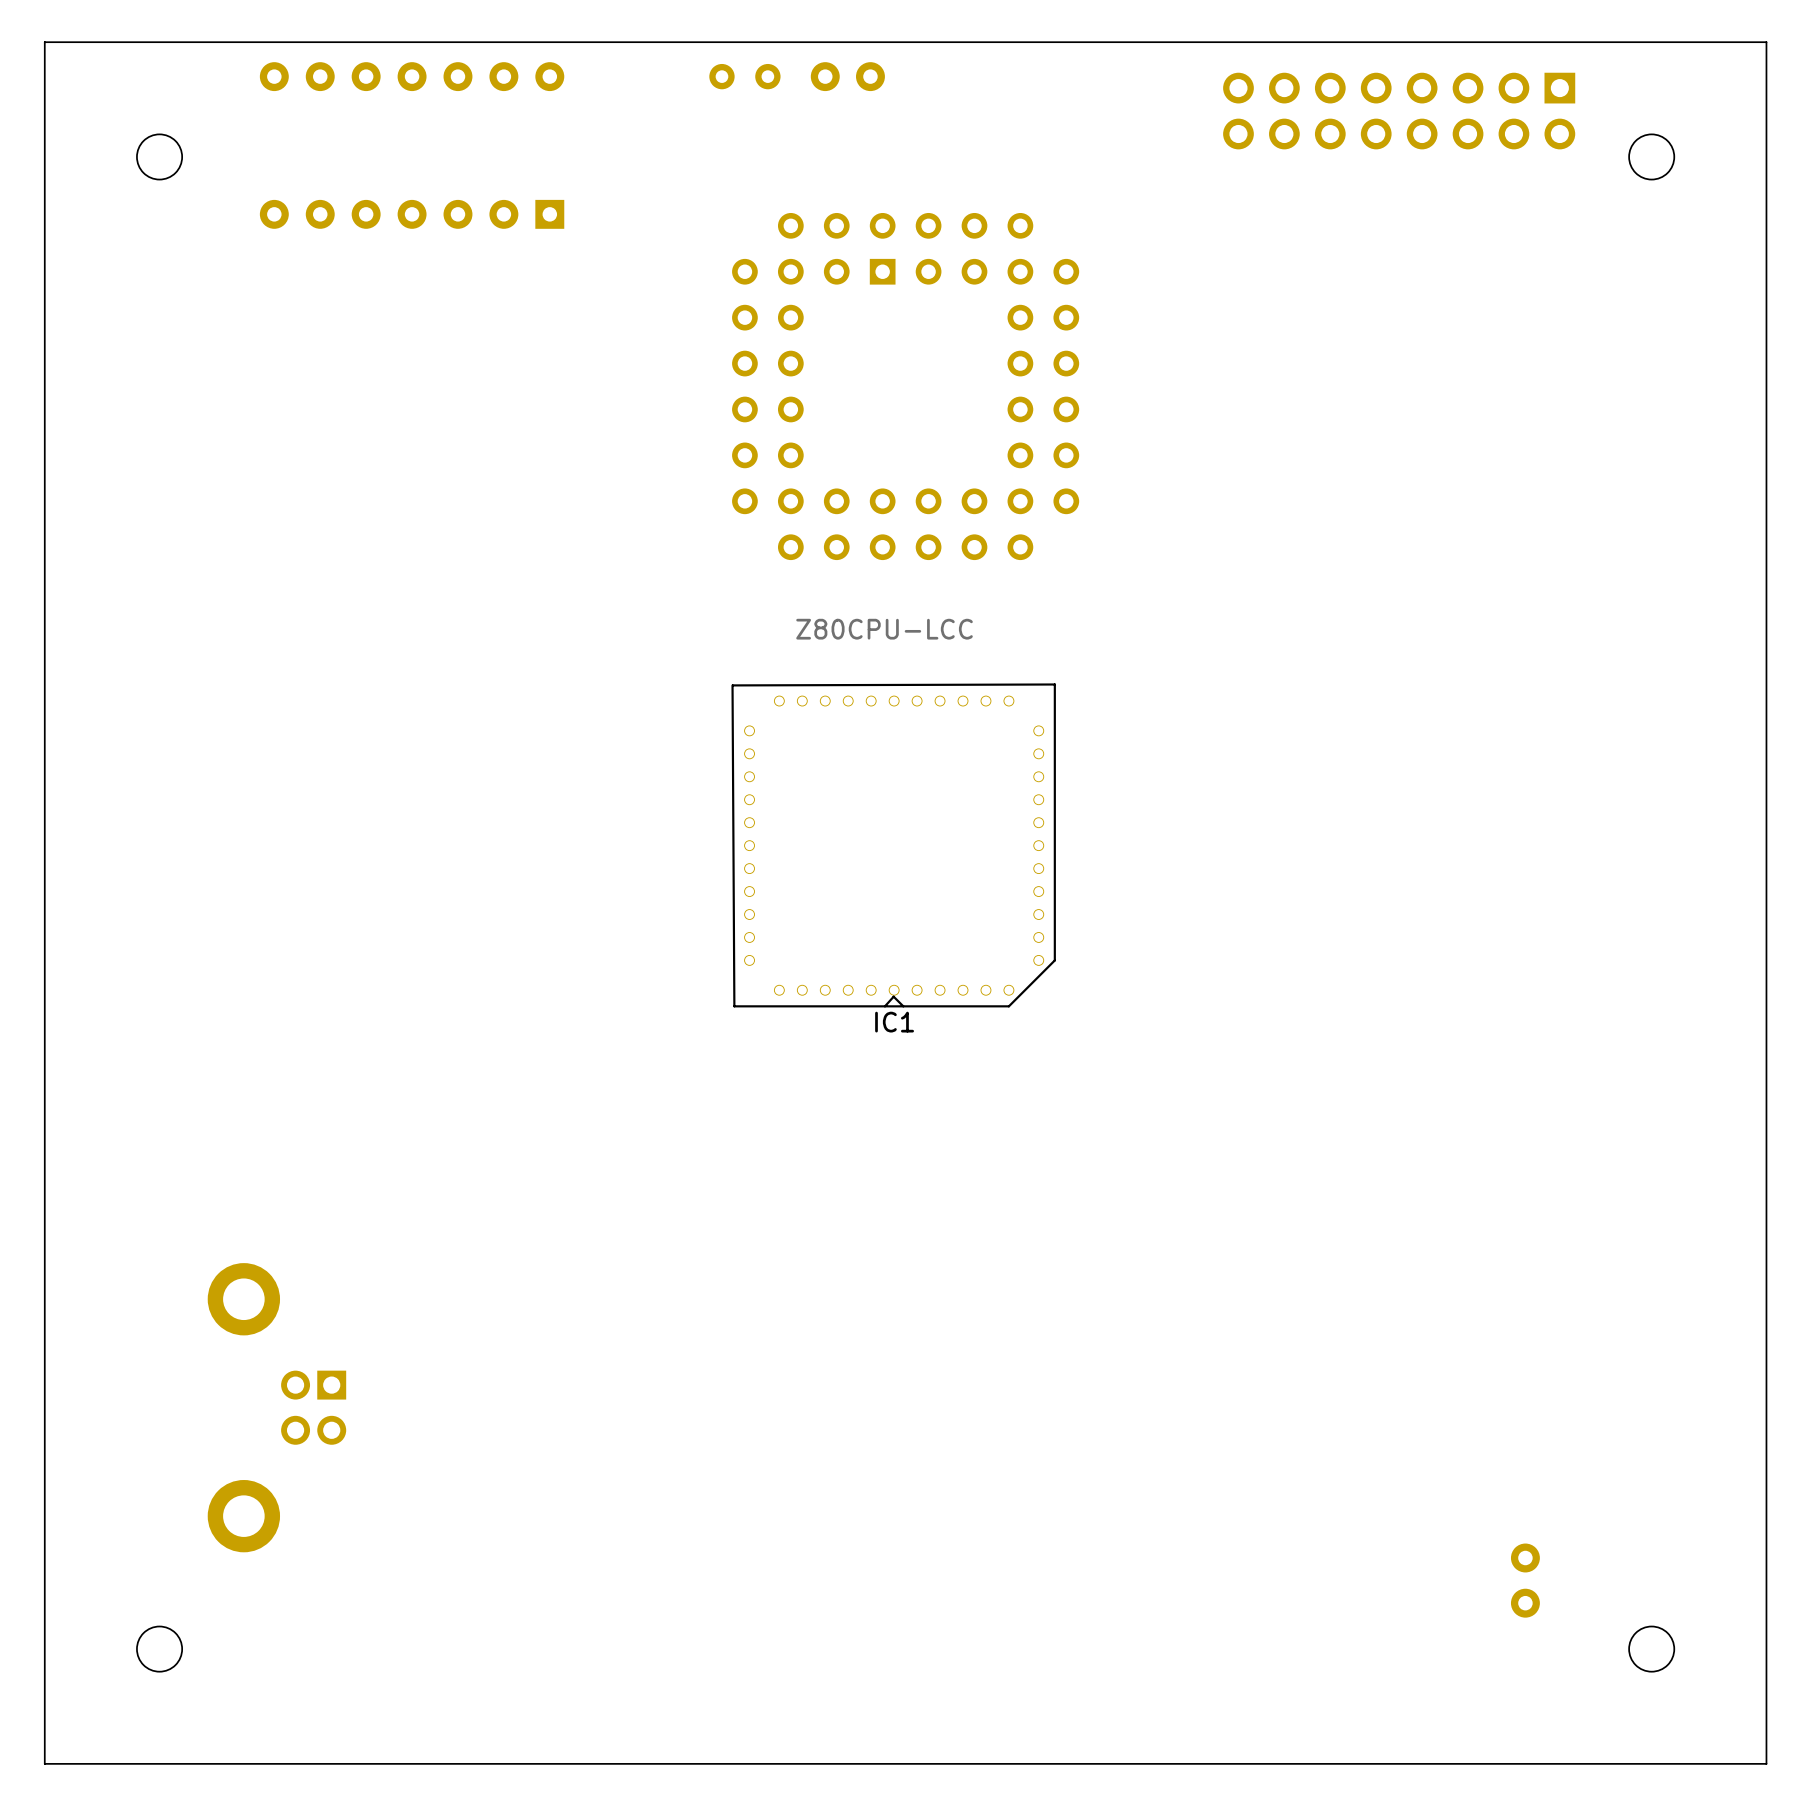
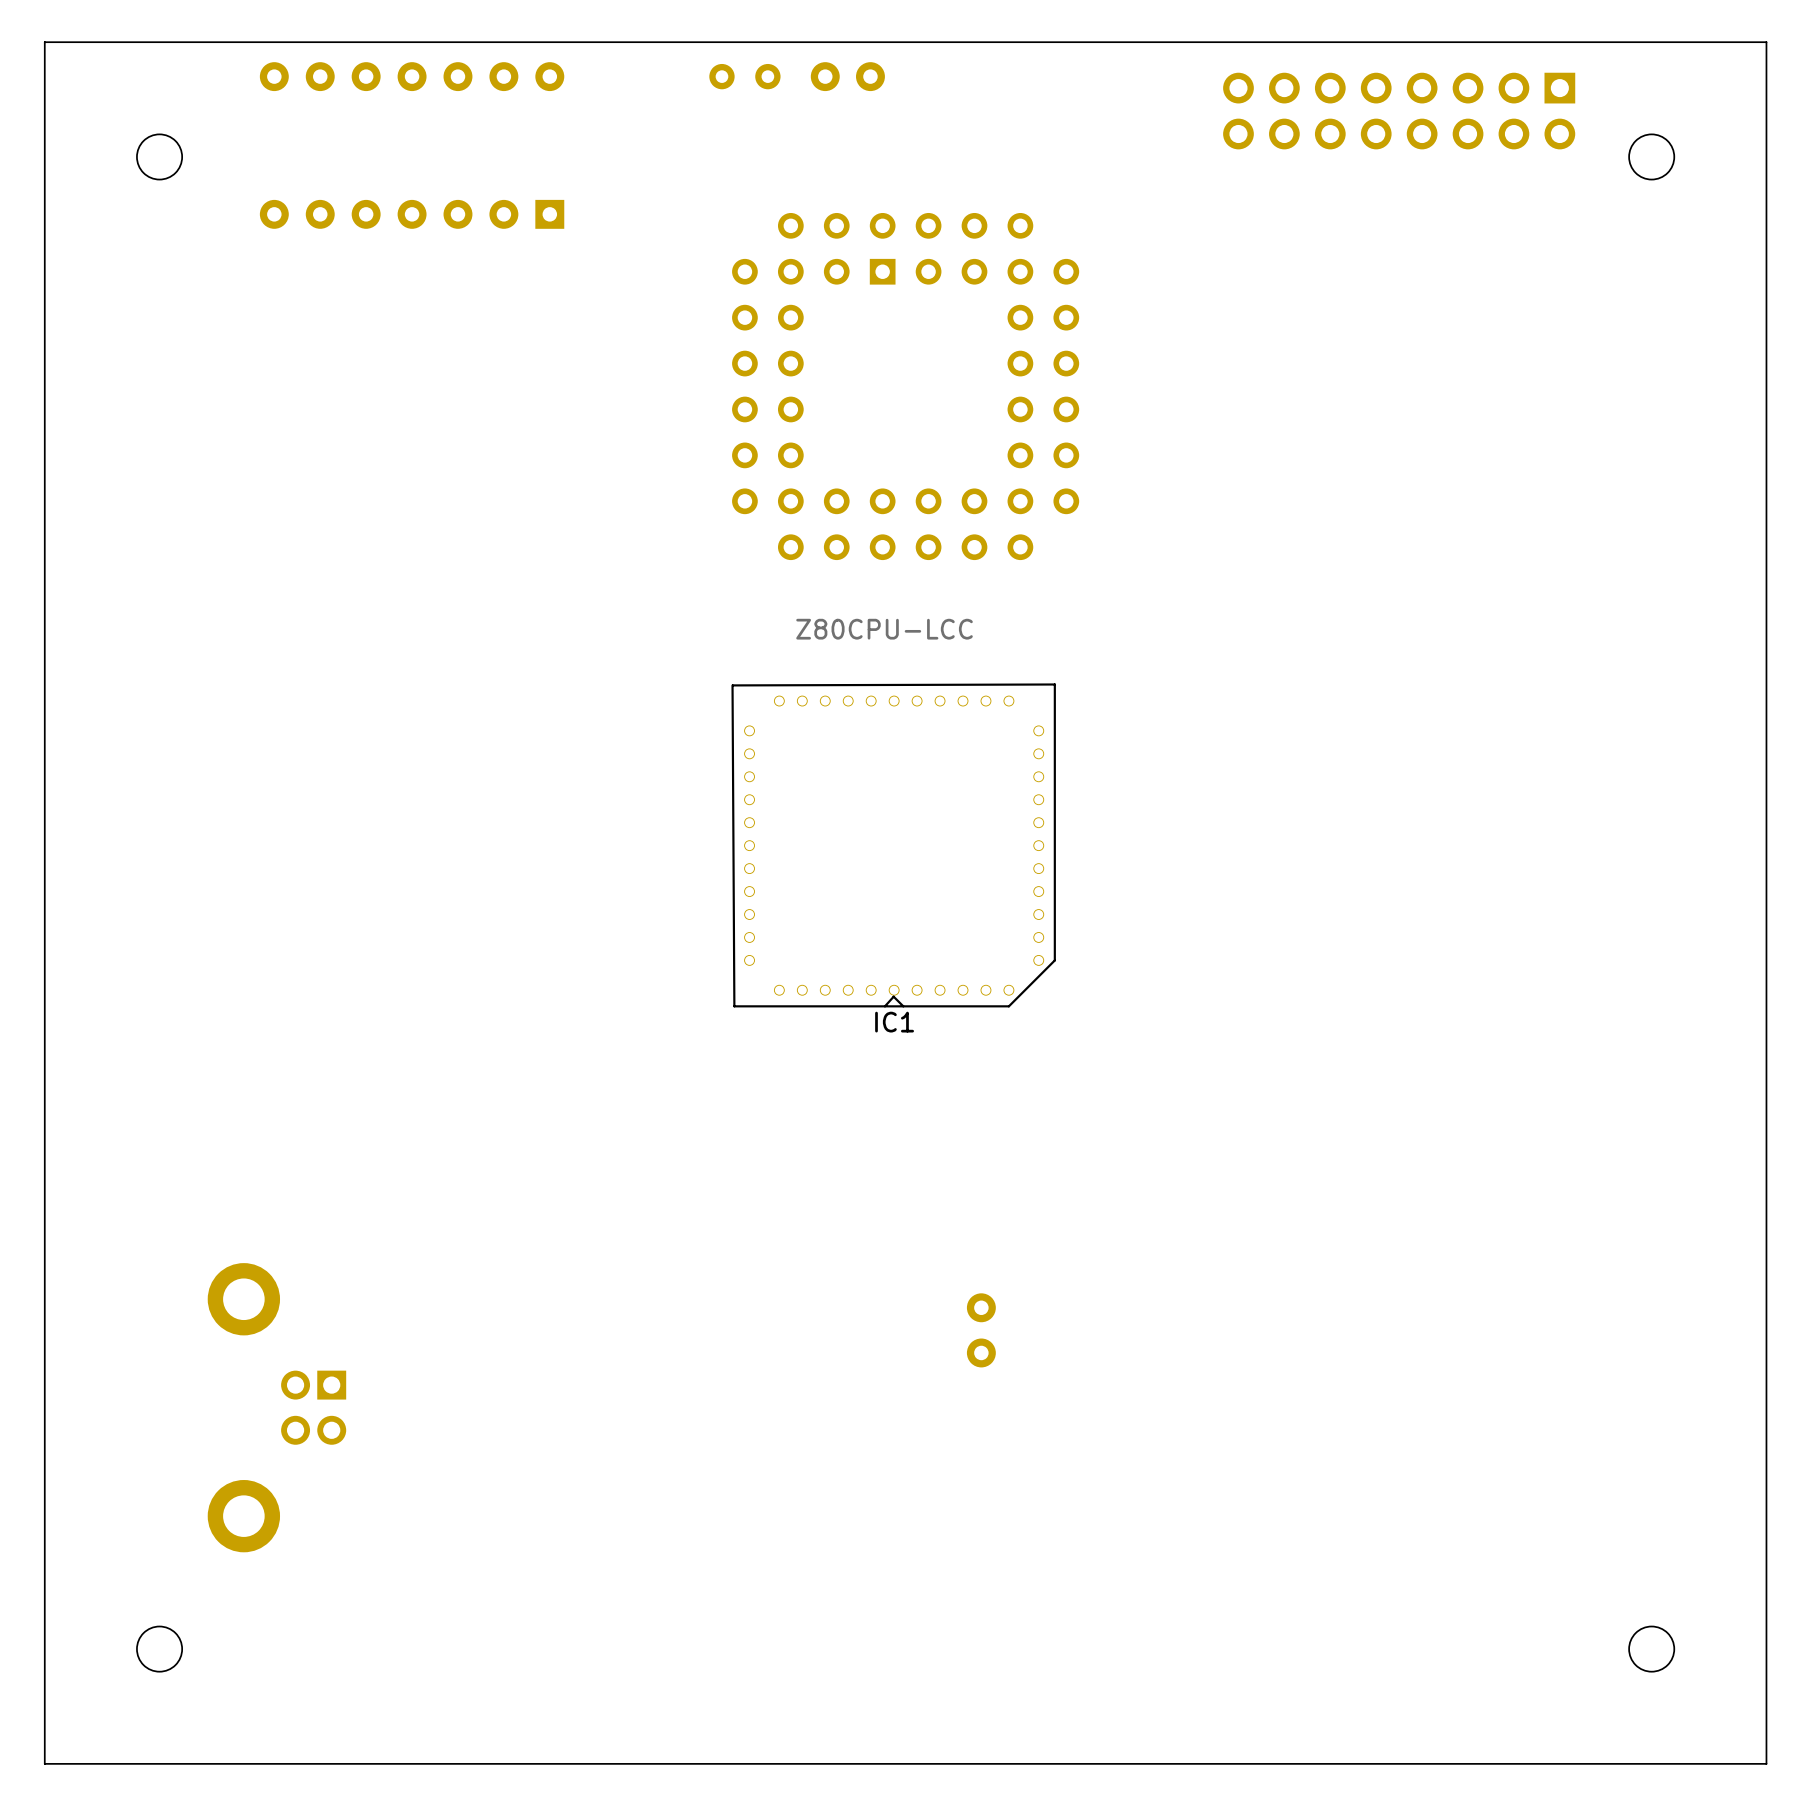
part: none -> (981, 1330)
part: (1525, 1580) -> none

